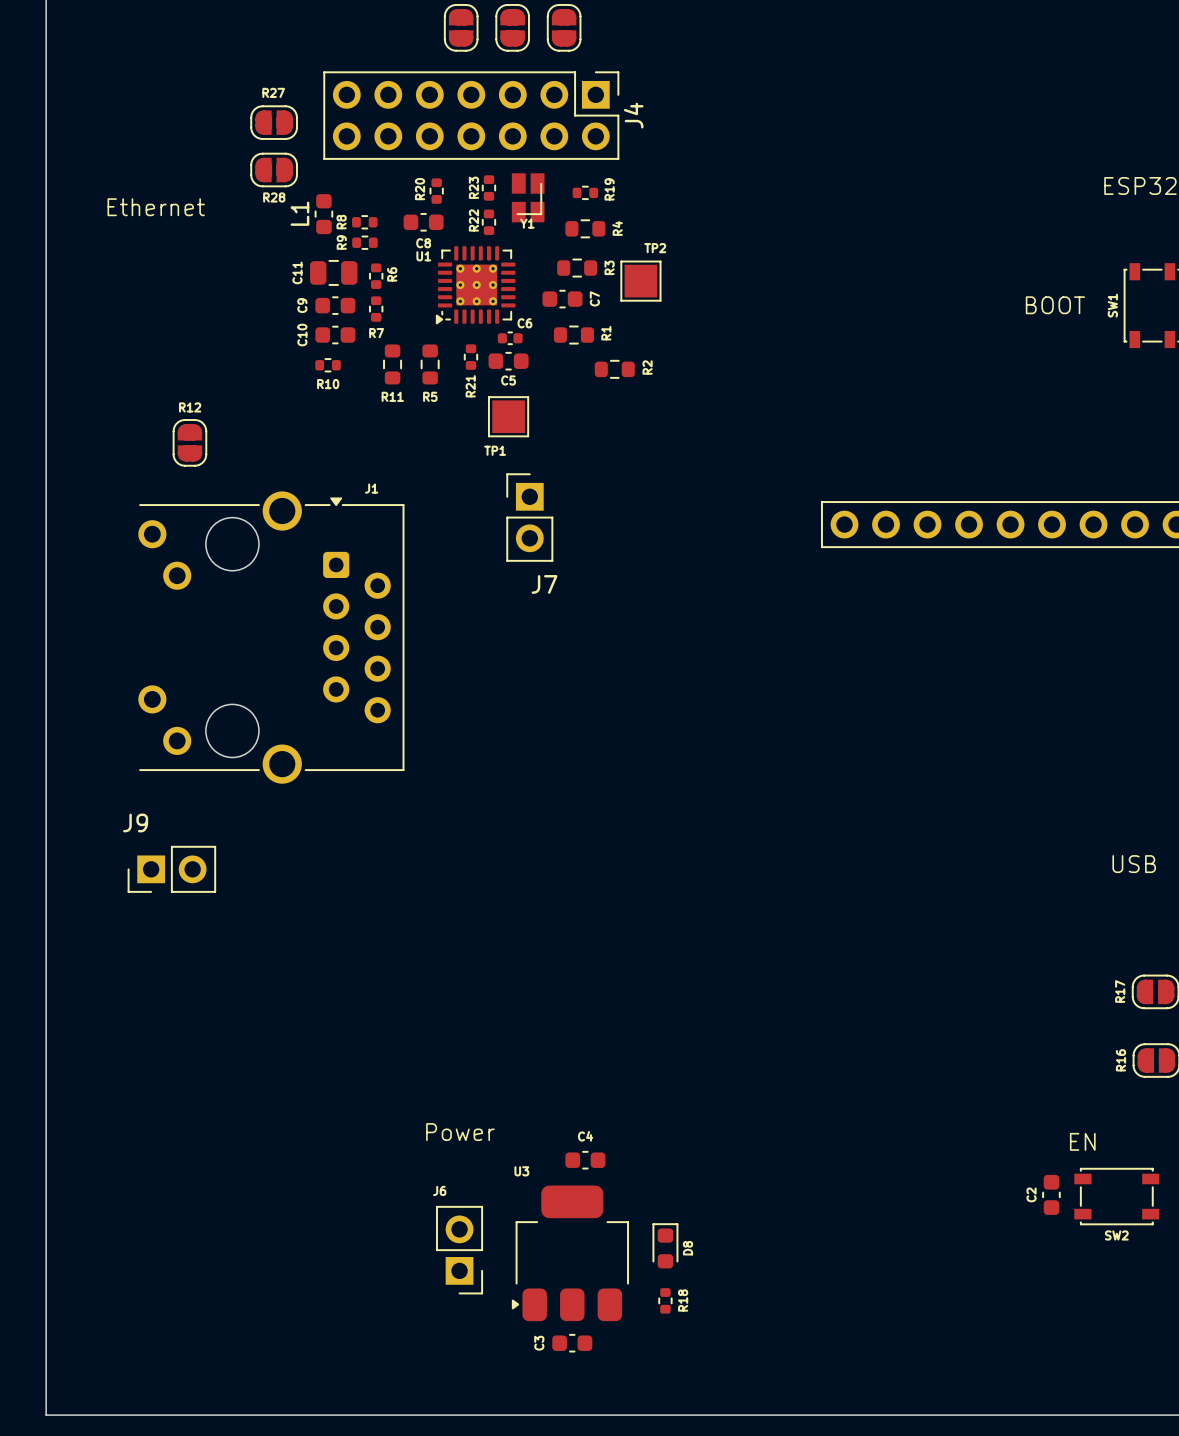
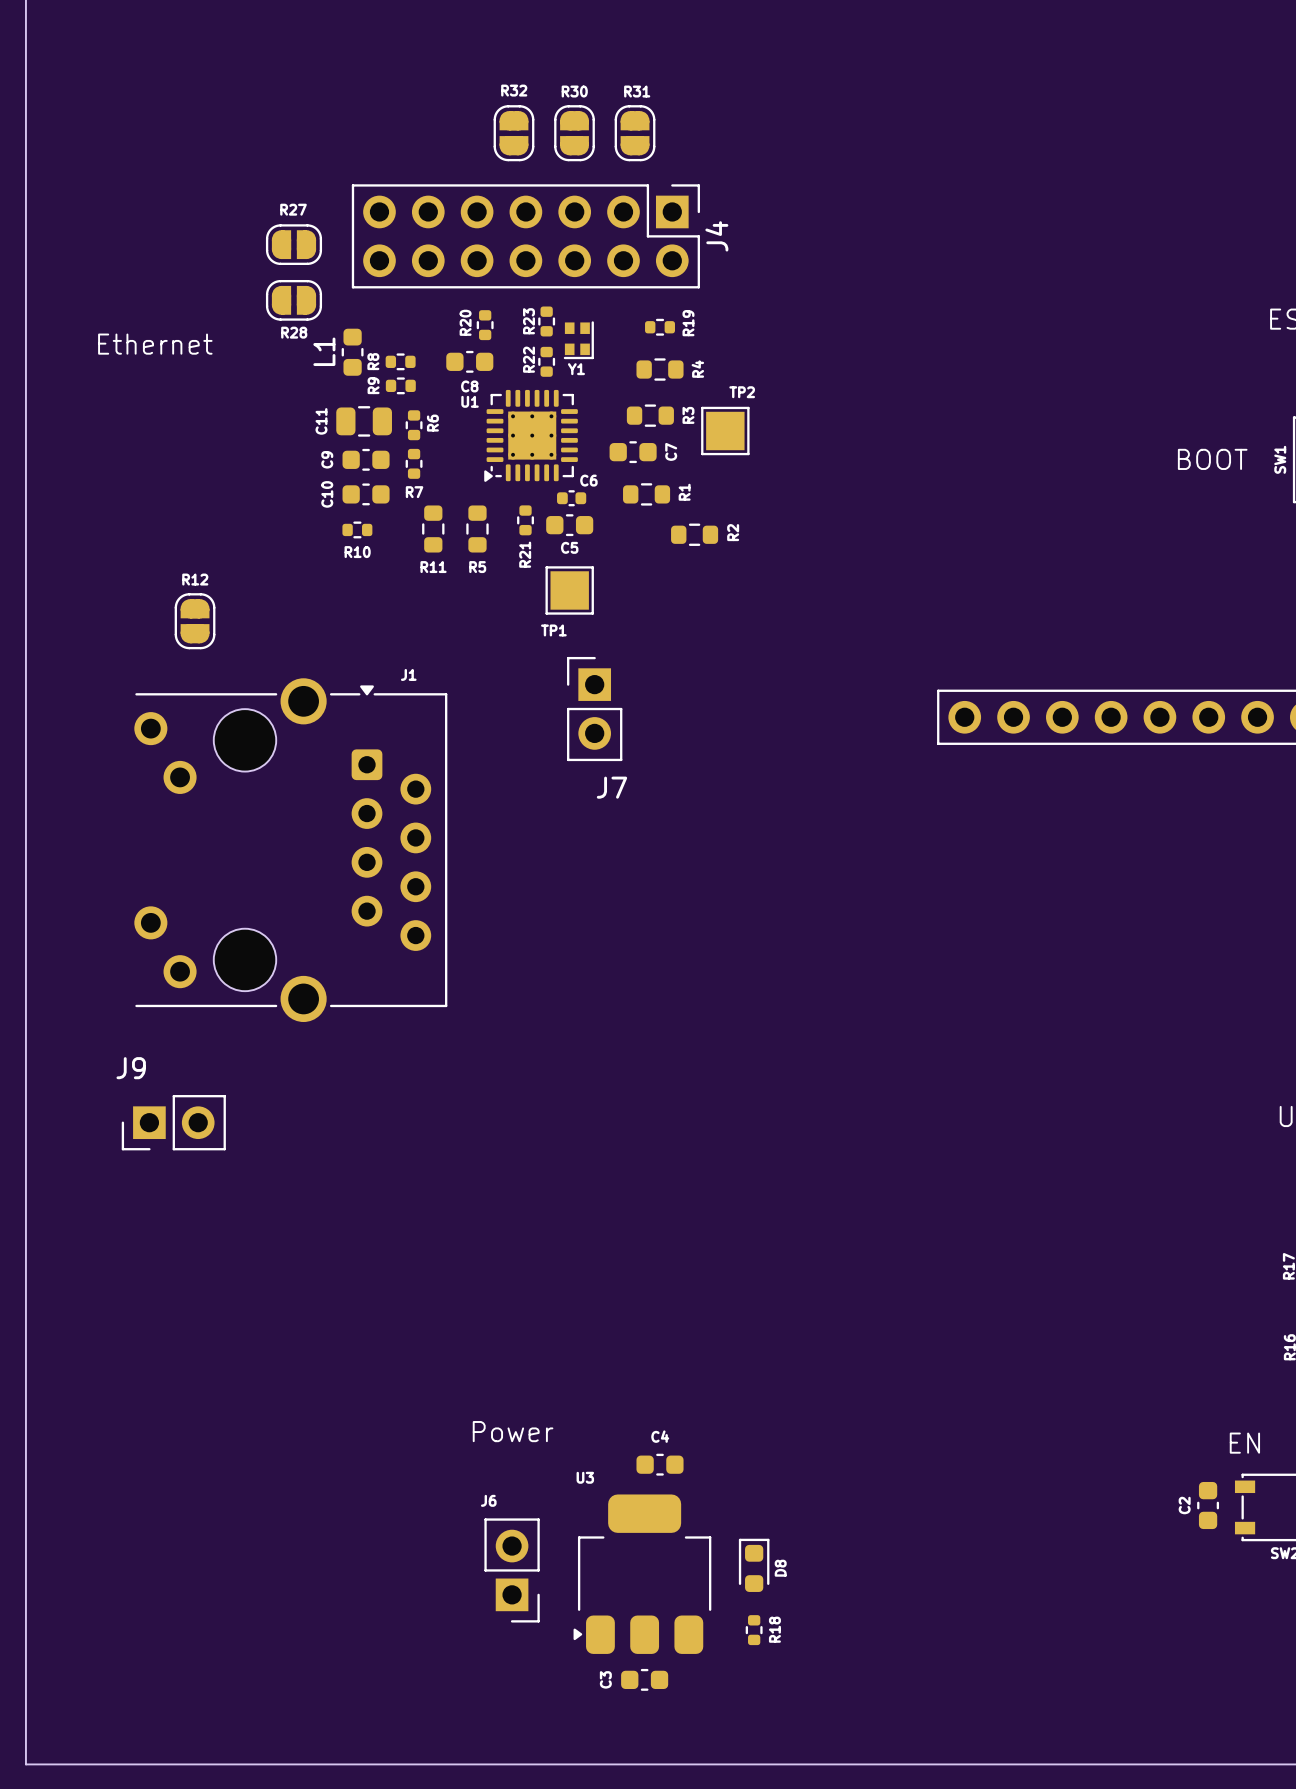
Y1 footprint: [511, 173, 545, 223] -> [563, 321, 594, 360]

